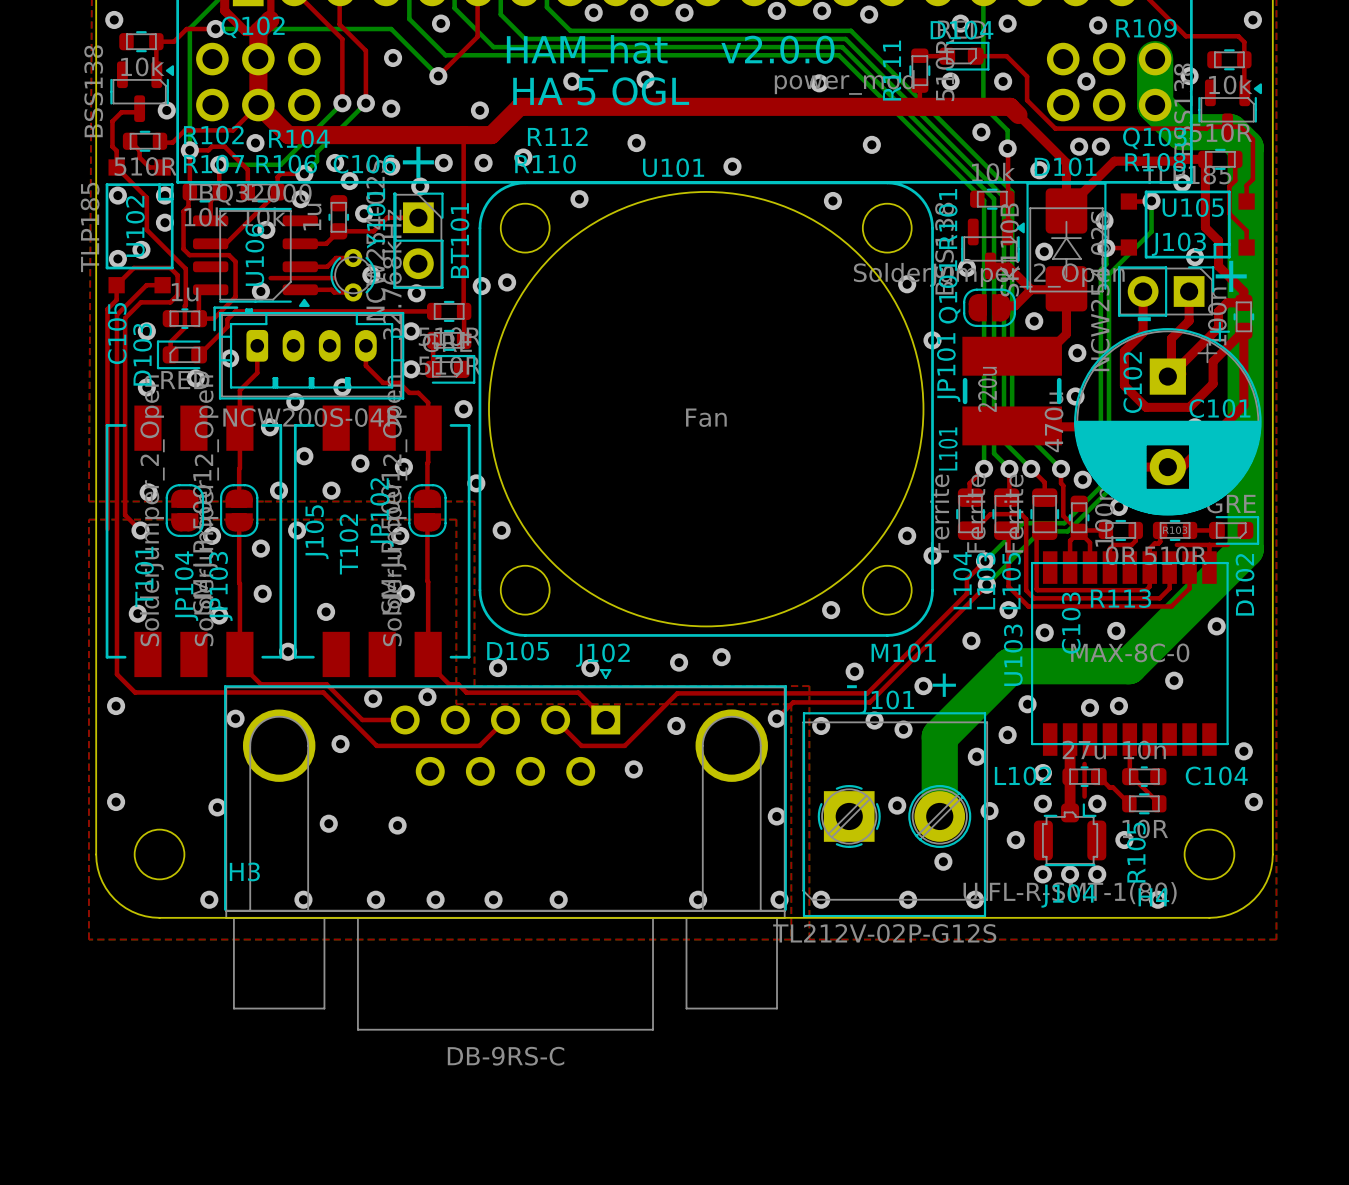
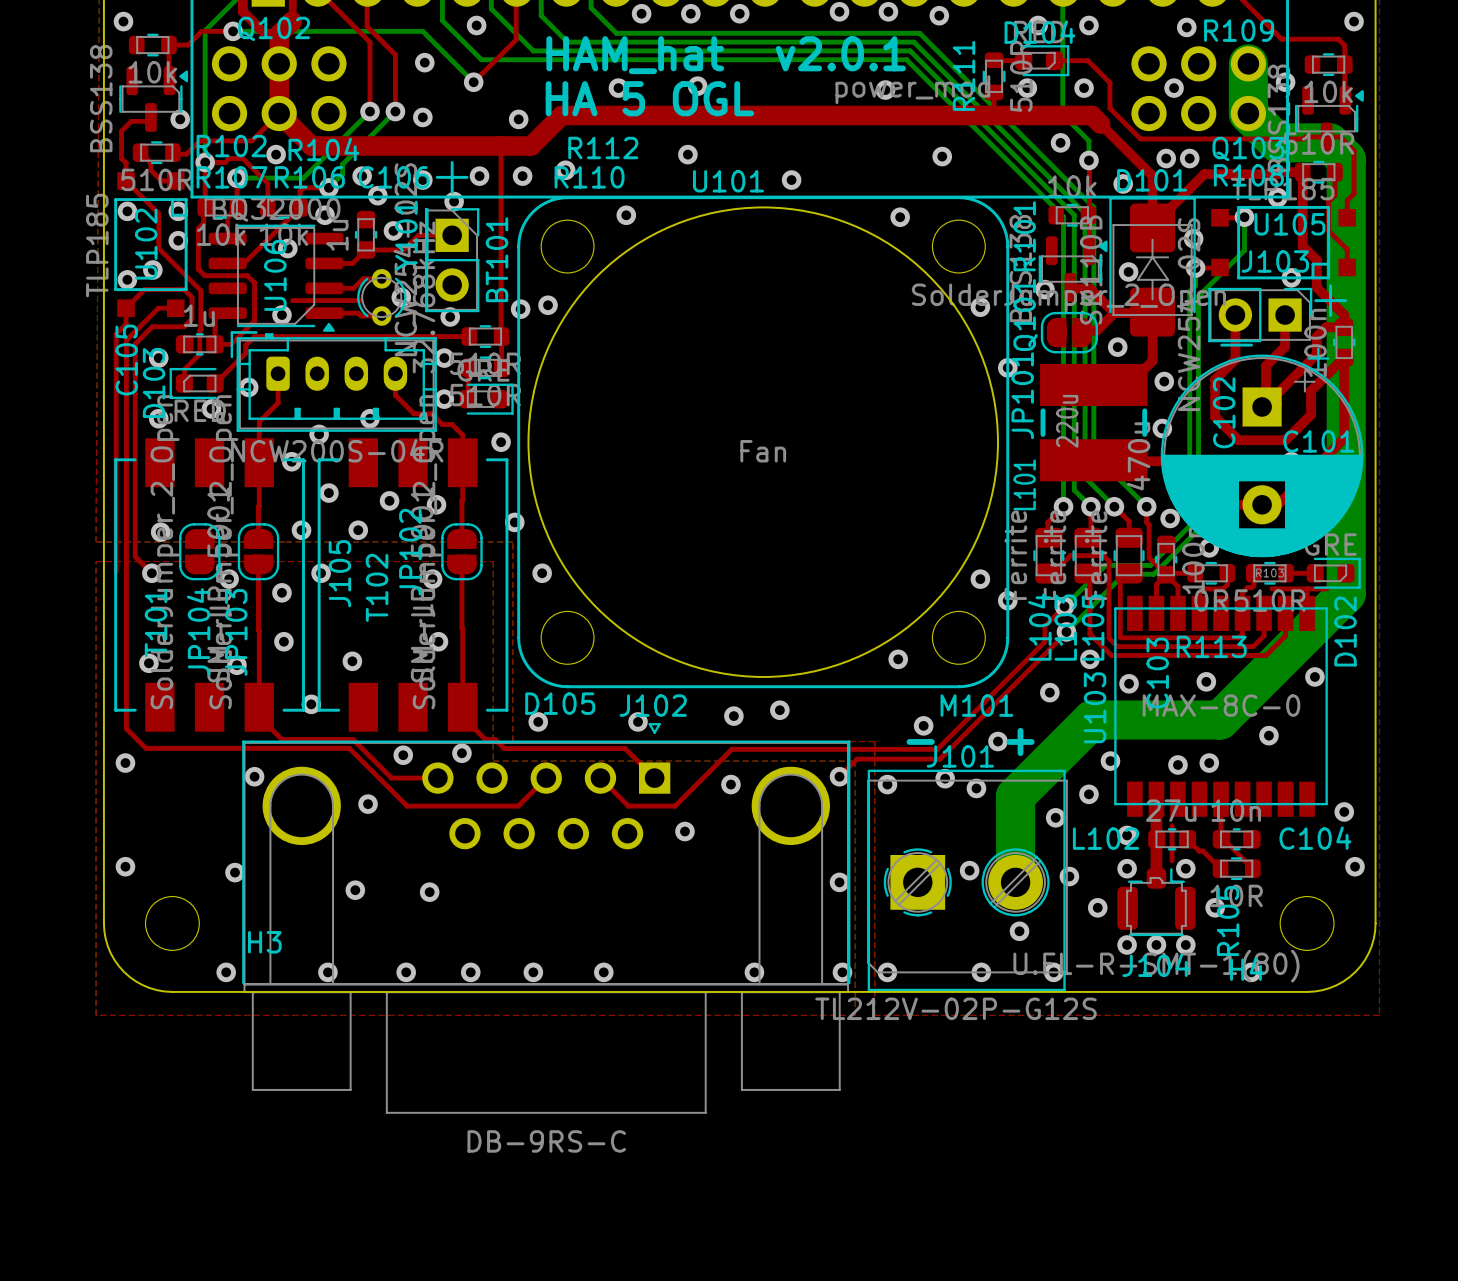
text: v2.0.0 (777, 49) -> v2.0.1 (840, 53)

